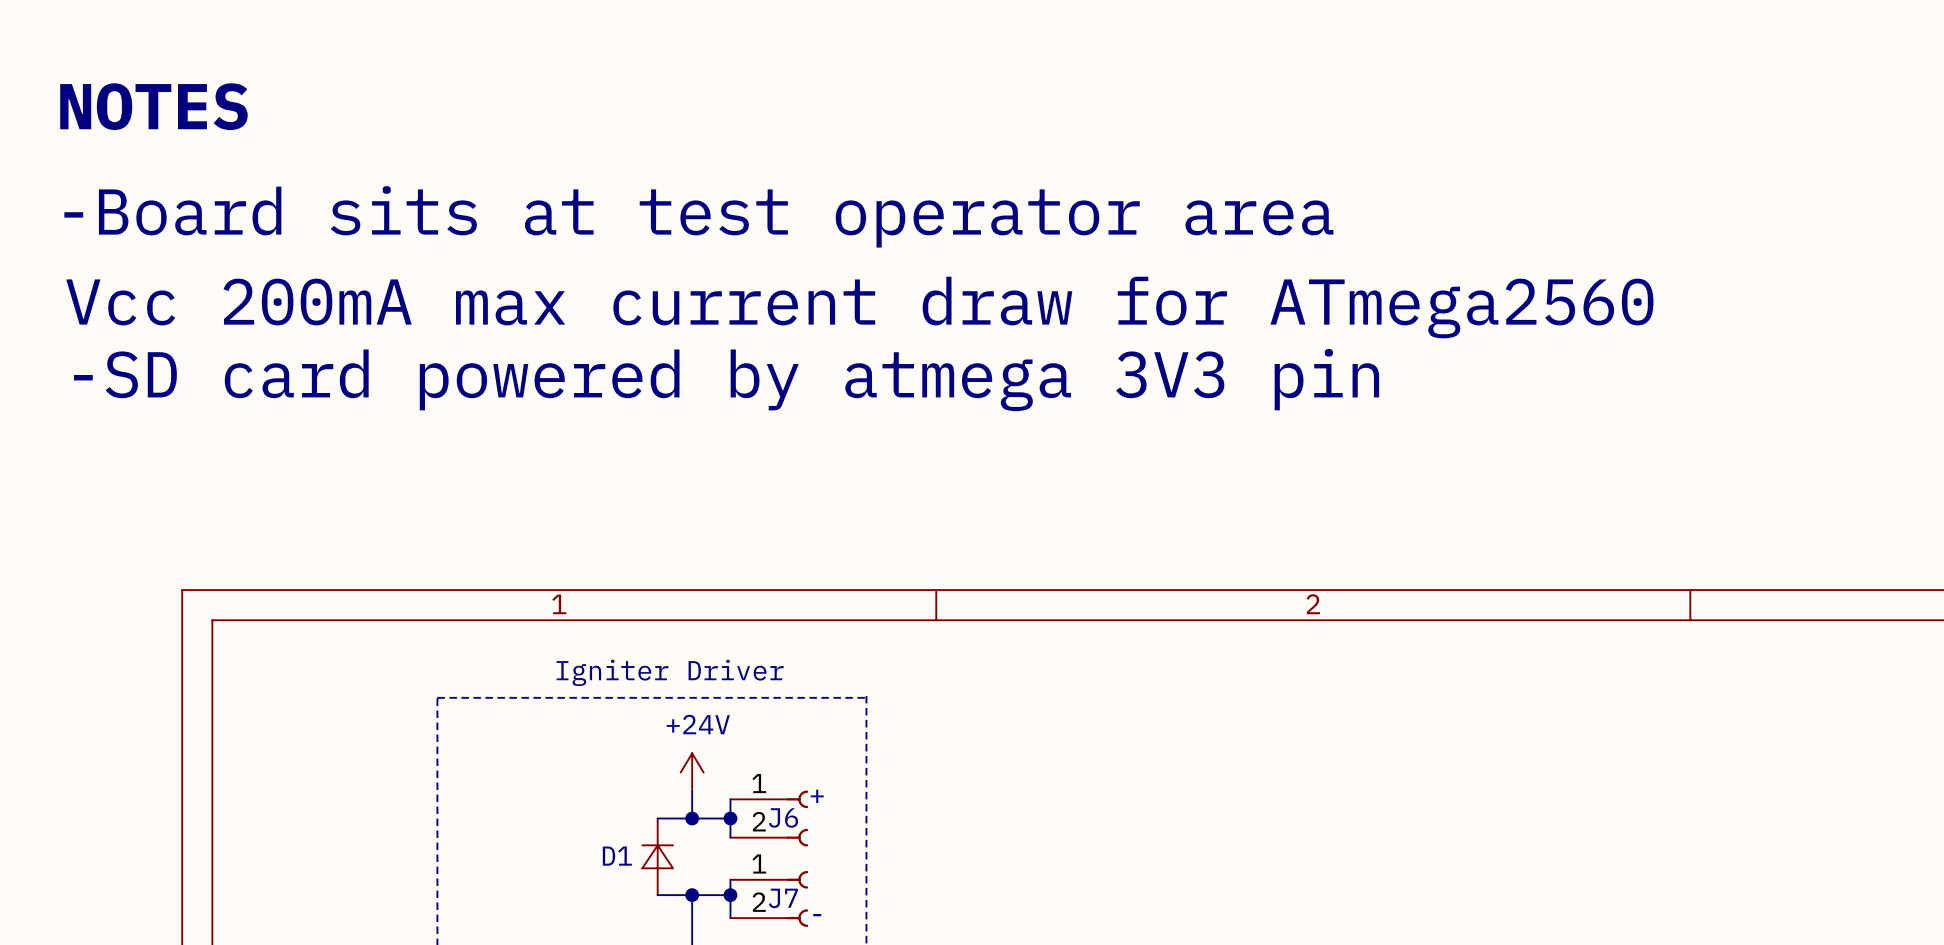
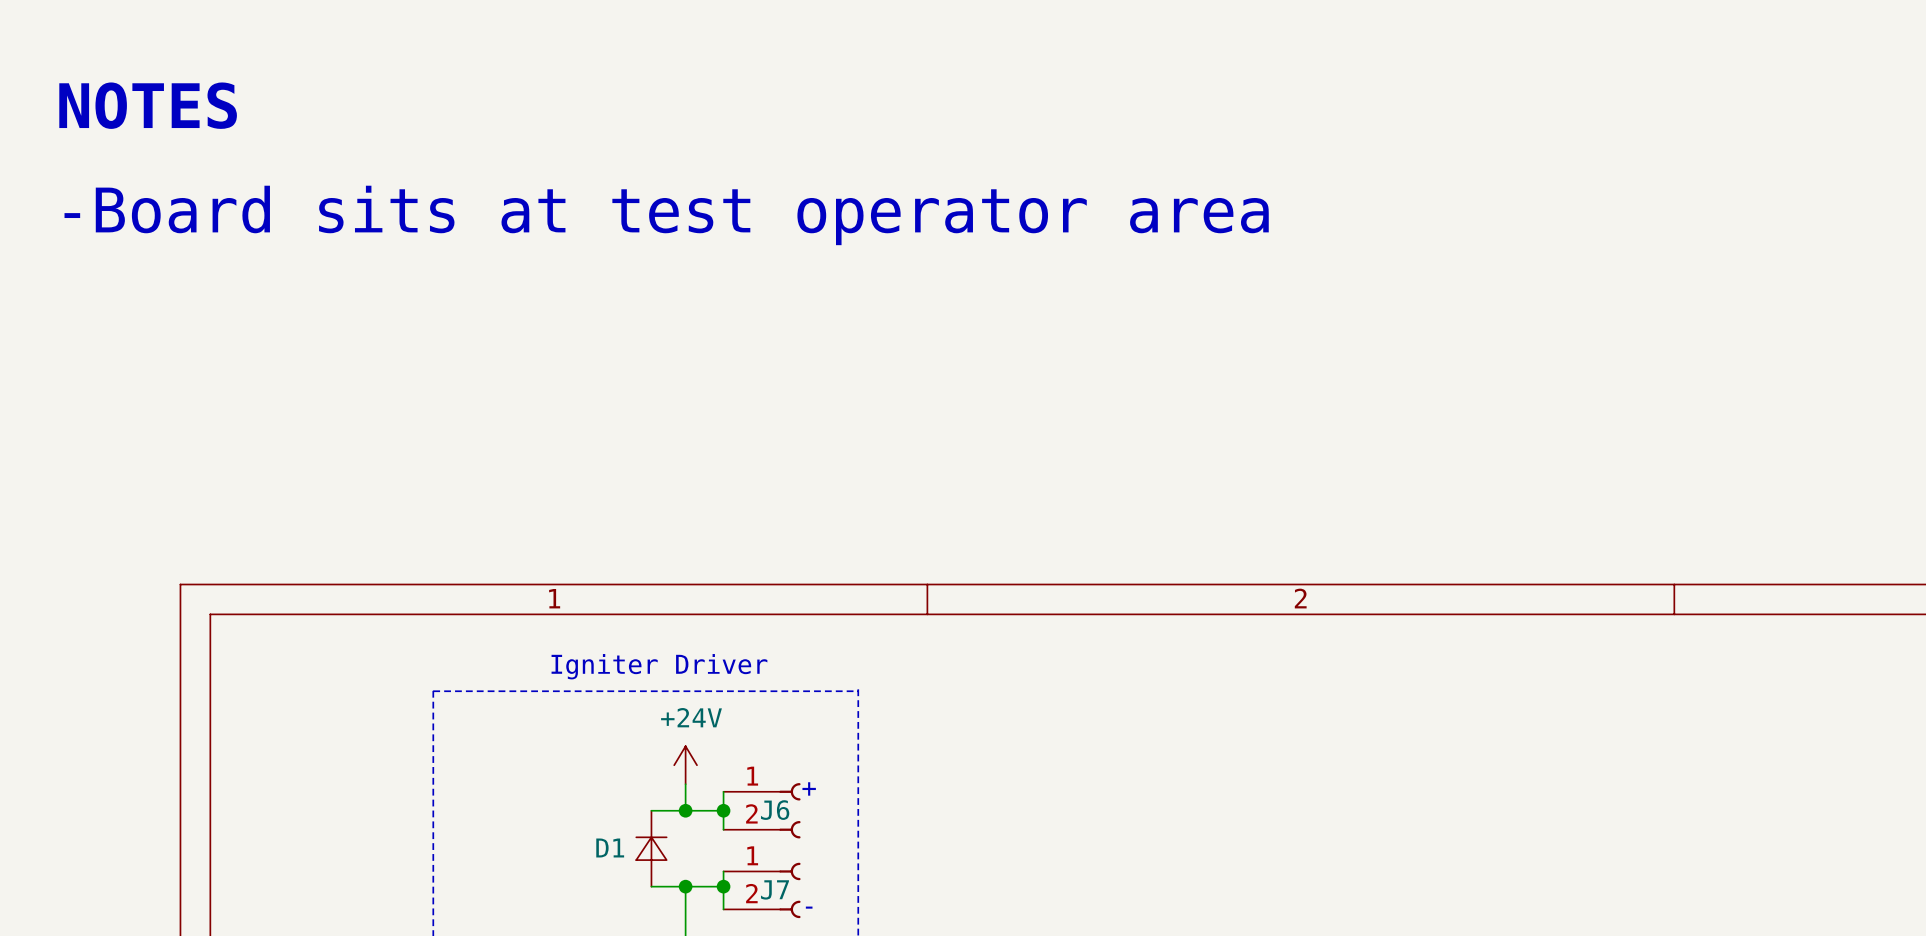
text: Vcc 200mA max current draw for ATmega2560 (859, 307) -> none
text: -SD card powered by atmega 3V3 pin (726, 380) -> none

